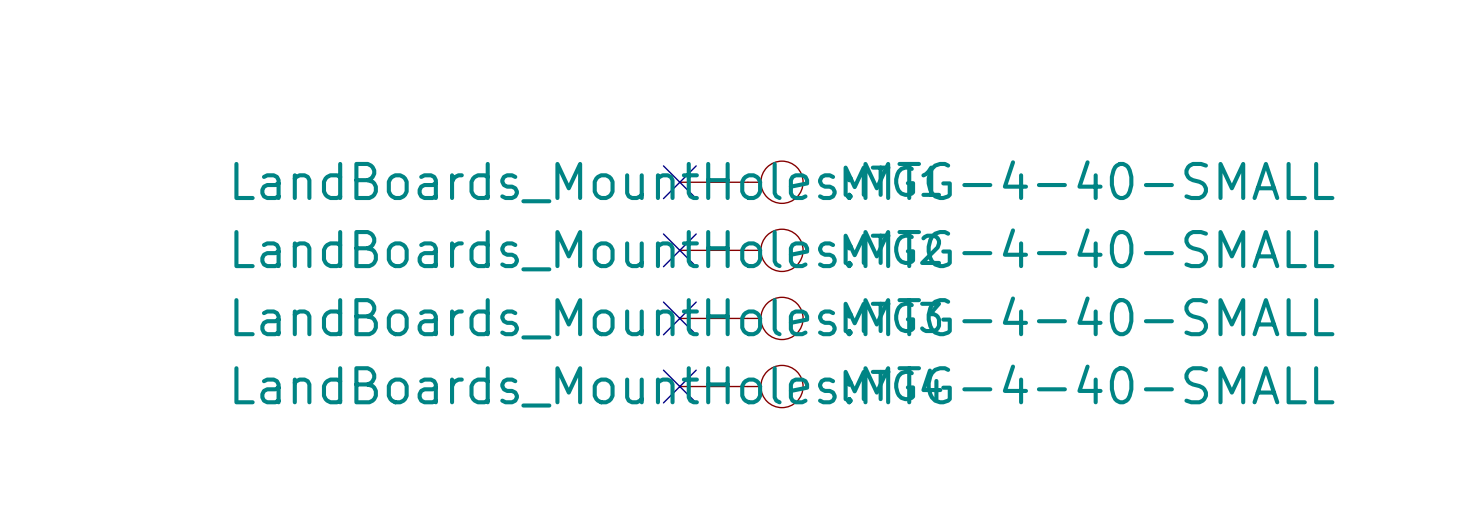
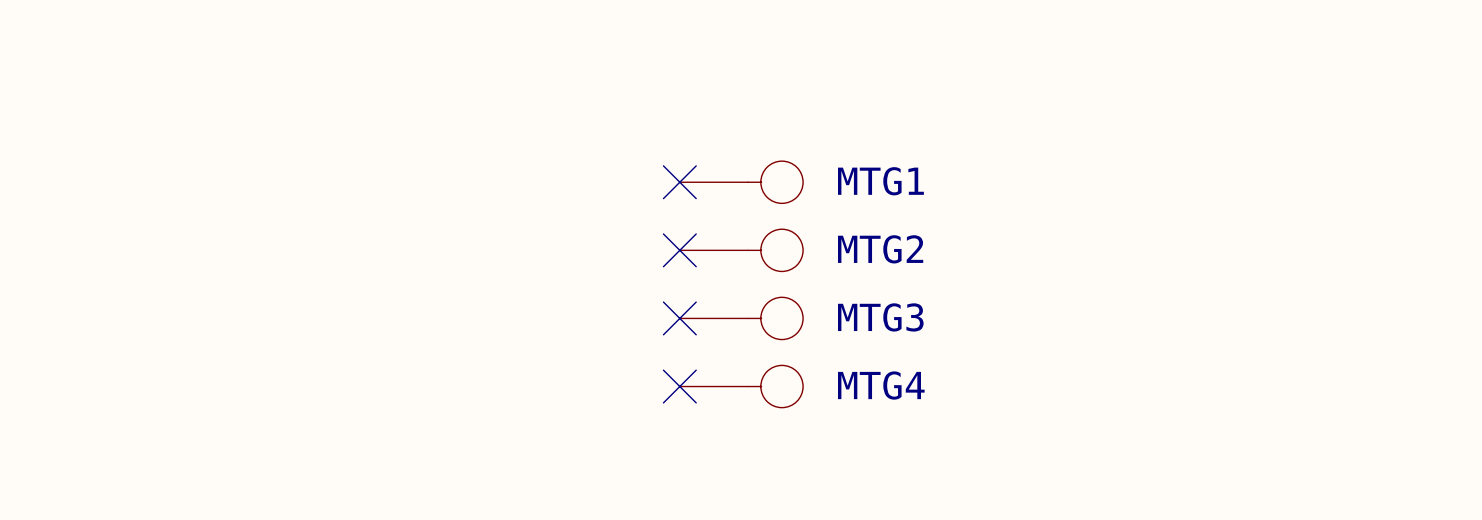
MTG1 text: LandBoards_MountHoles:MTG-4-40-SMALL (784, 181) -> none
MTG2 text: LandBoards_MountHoles:MTG-4-40-SMALL (784, 249) -> none
MTG3 text: LandBoards_MountHoles:MTG-4-40-SMALL (784, 317) -> none
MTG4 text: LandBoards_MountHoles:MTG-4-40-SMALL (784, 386) -> none

